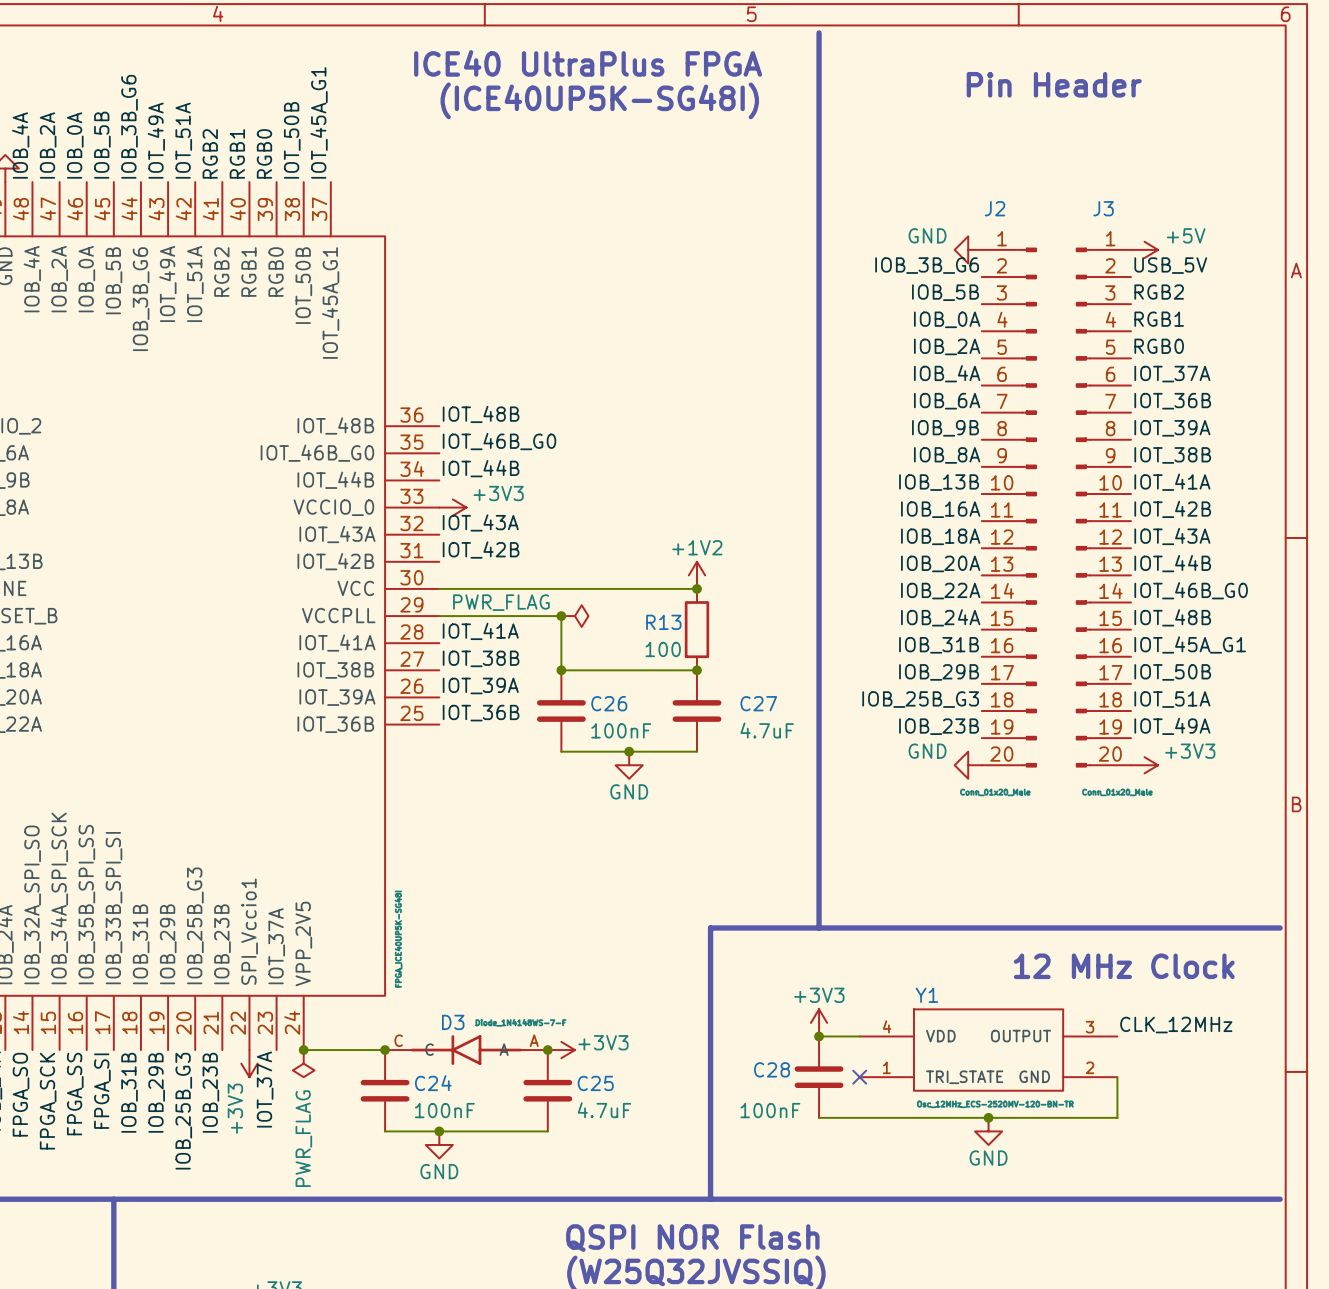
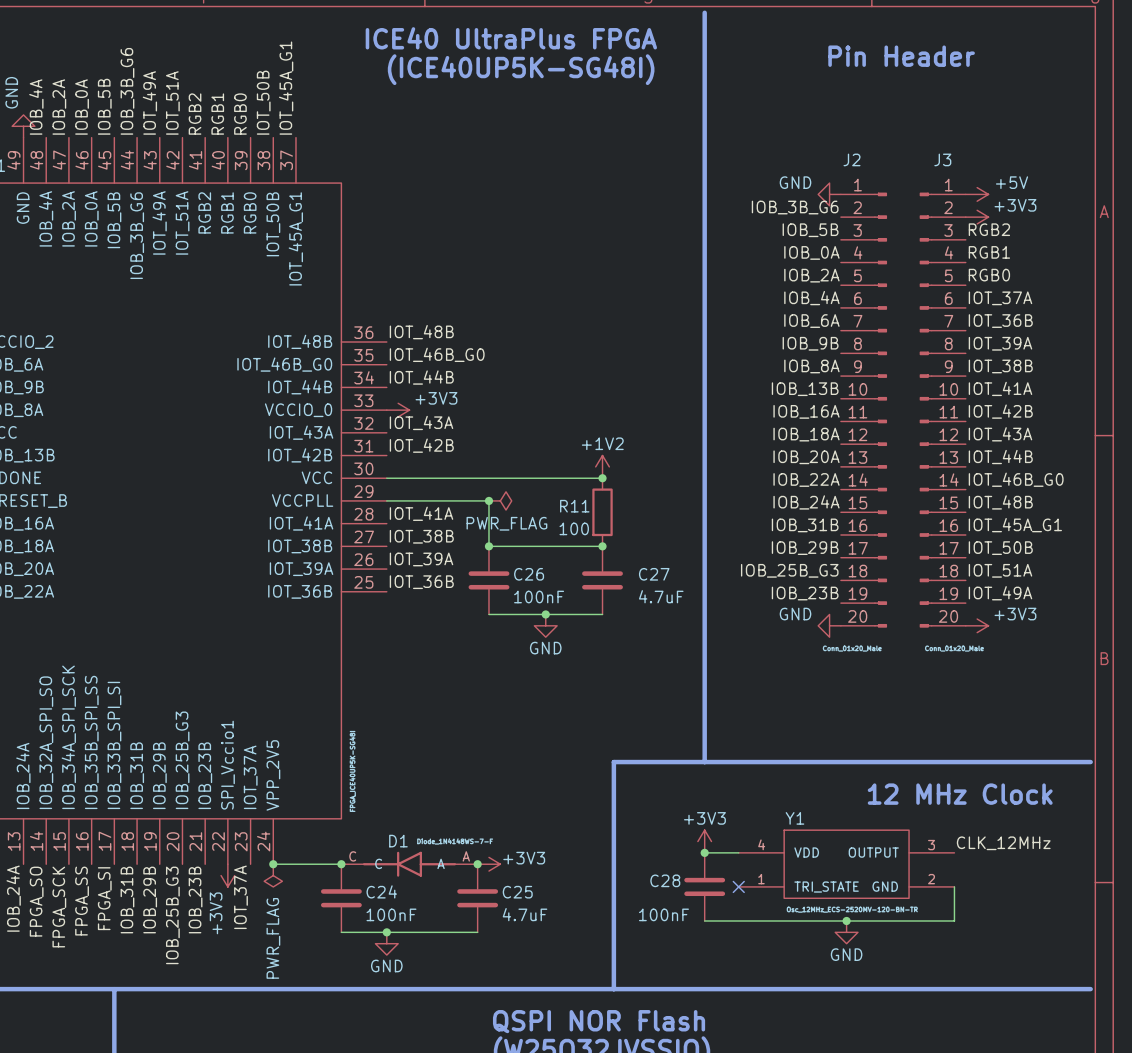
label: USB_5V (1170, 265) -> none
power symbol: none -> +3V3 (977, 217)
power symbol text position: PWR_FLAG (501, 602) -> PWR_FLAG (506, 523)
R13 name: R13 (663, 622) -> R11 (574, 506)
D3 name: D3 (453, 1022) -> D1 (398, 841)

